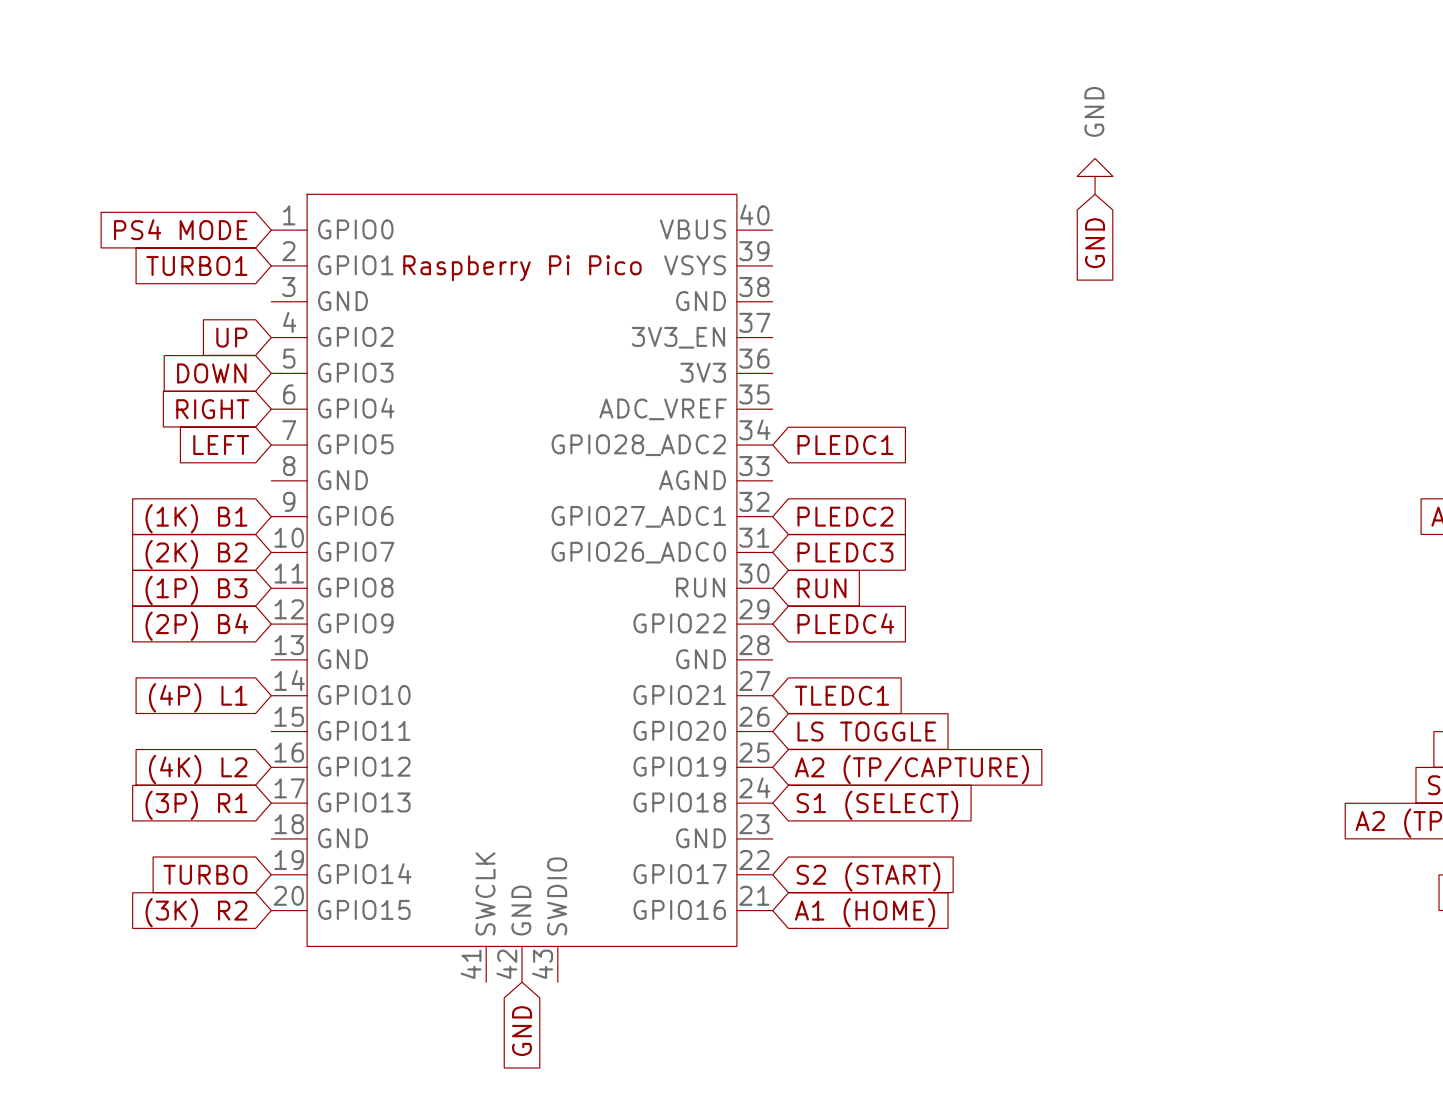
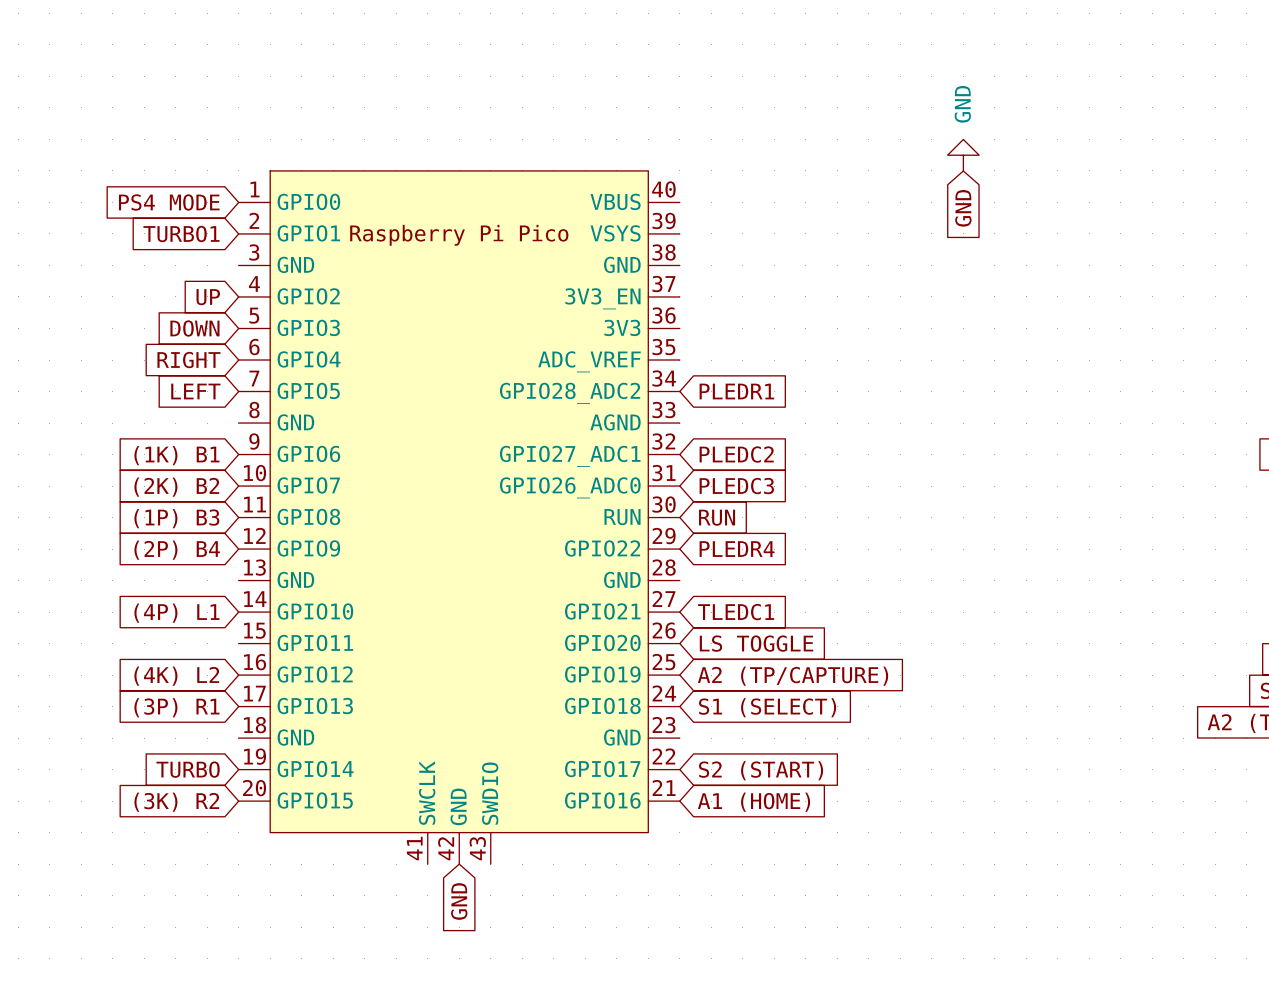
global label: PLEDC1 (845, 445) -> PLEDR1 (736, 391)
global label: PLEDC4 (845, 623) -> PLEDR4 (737, 549)

